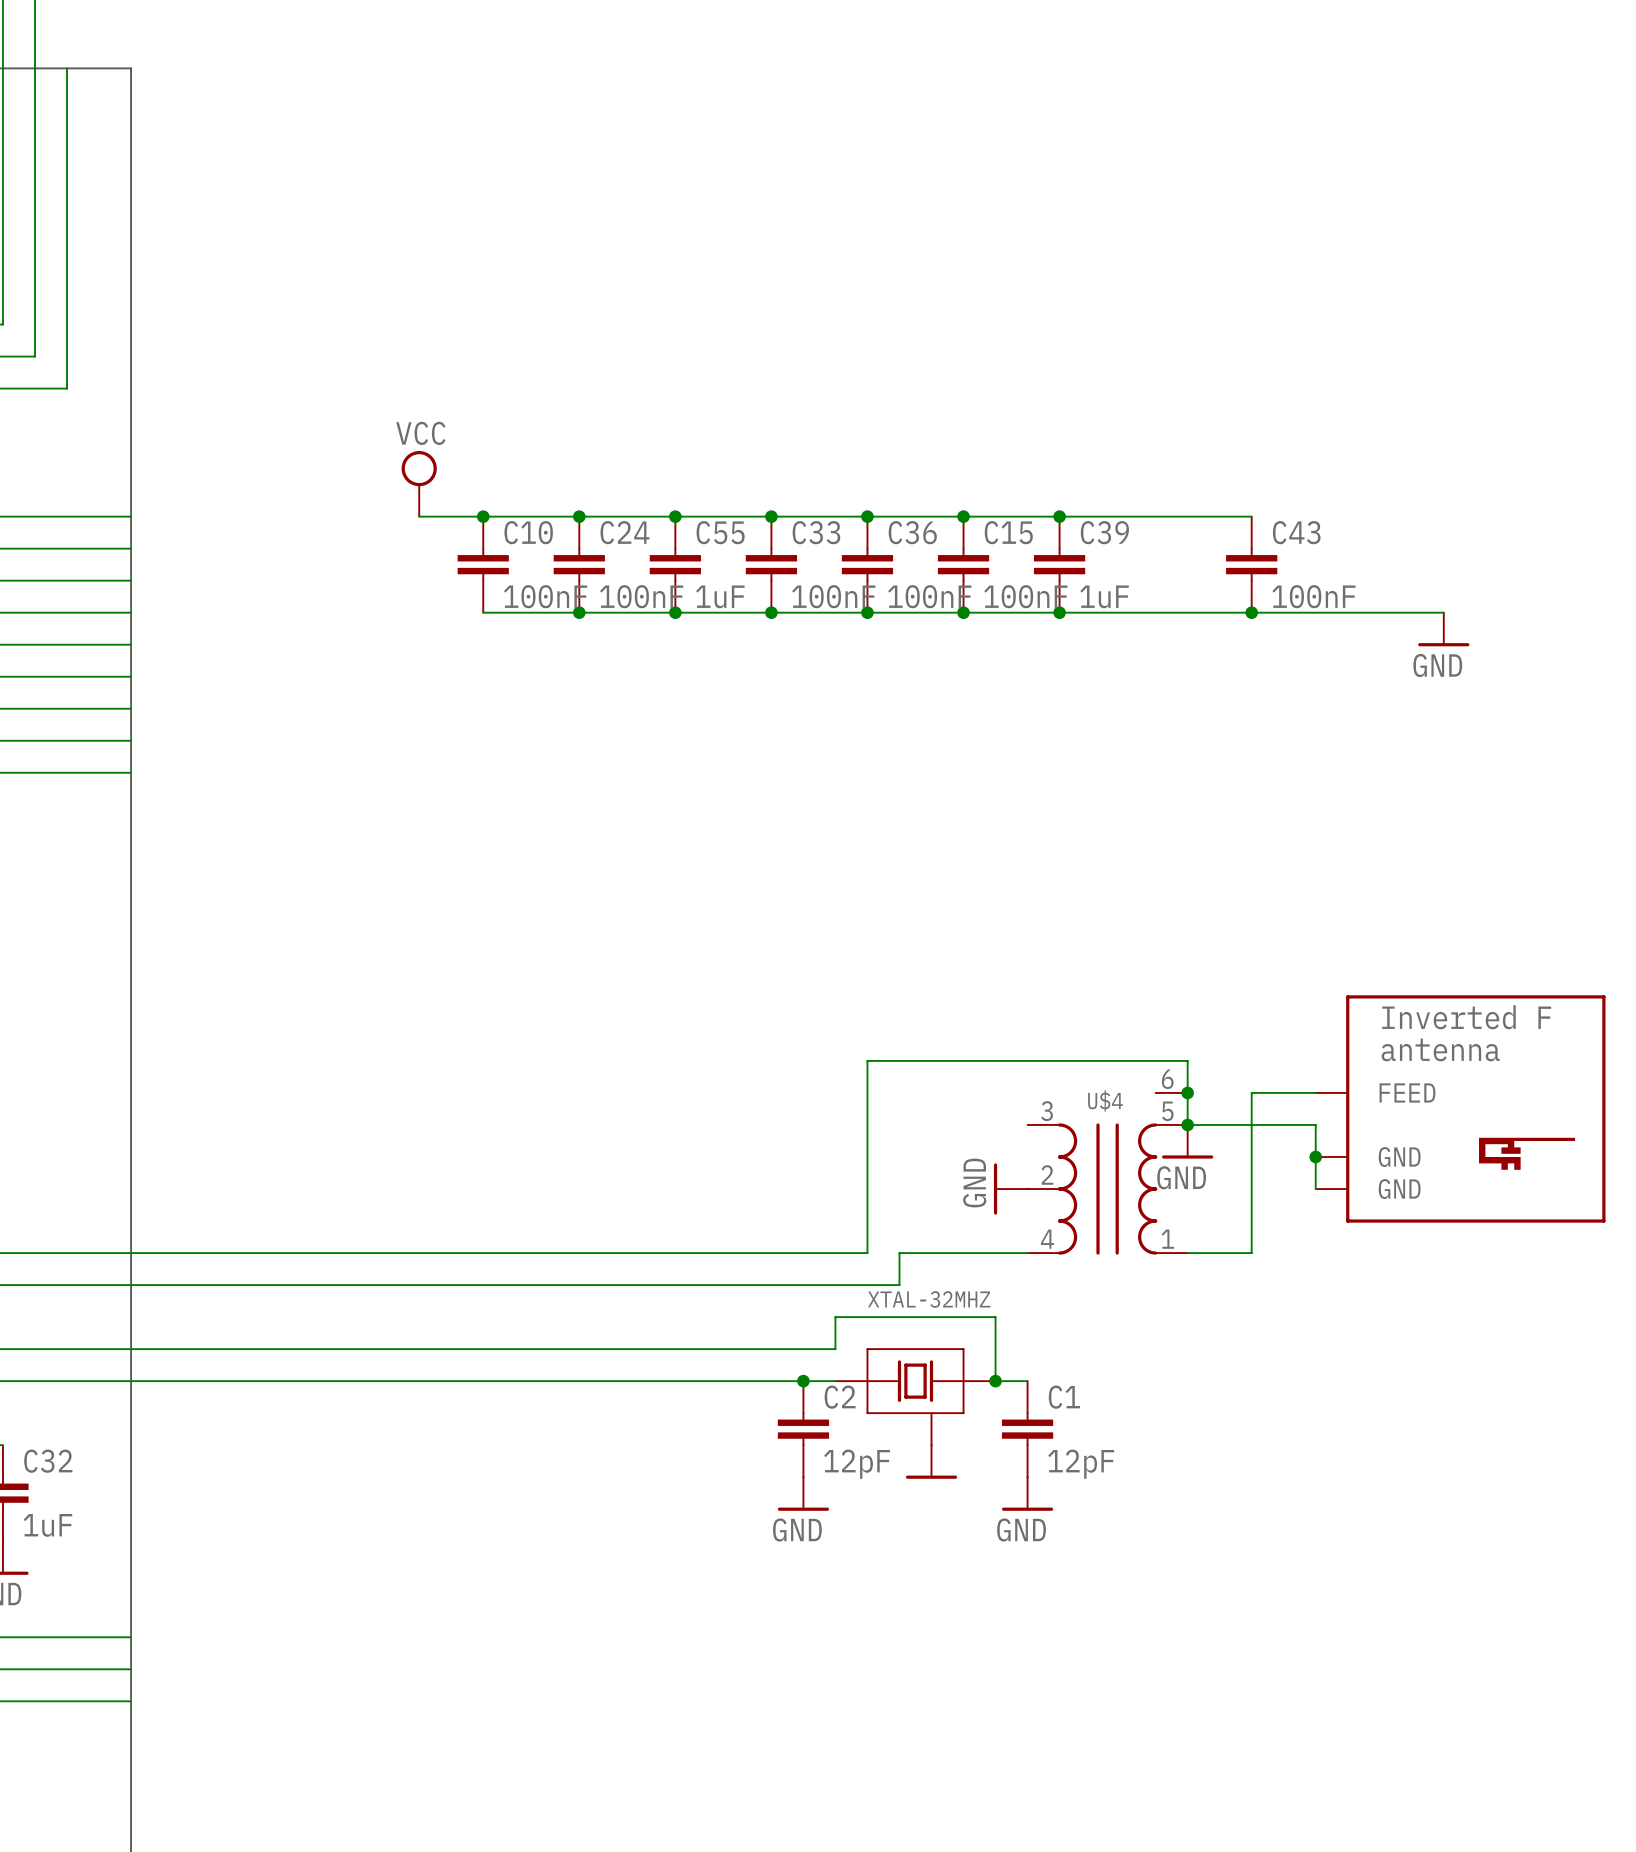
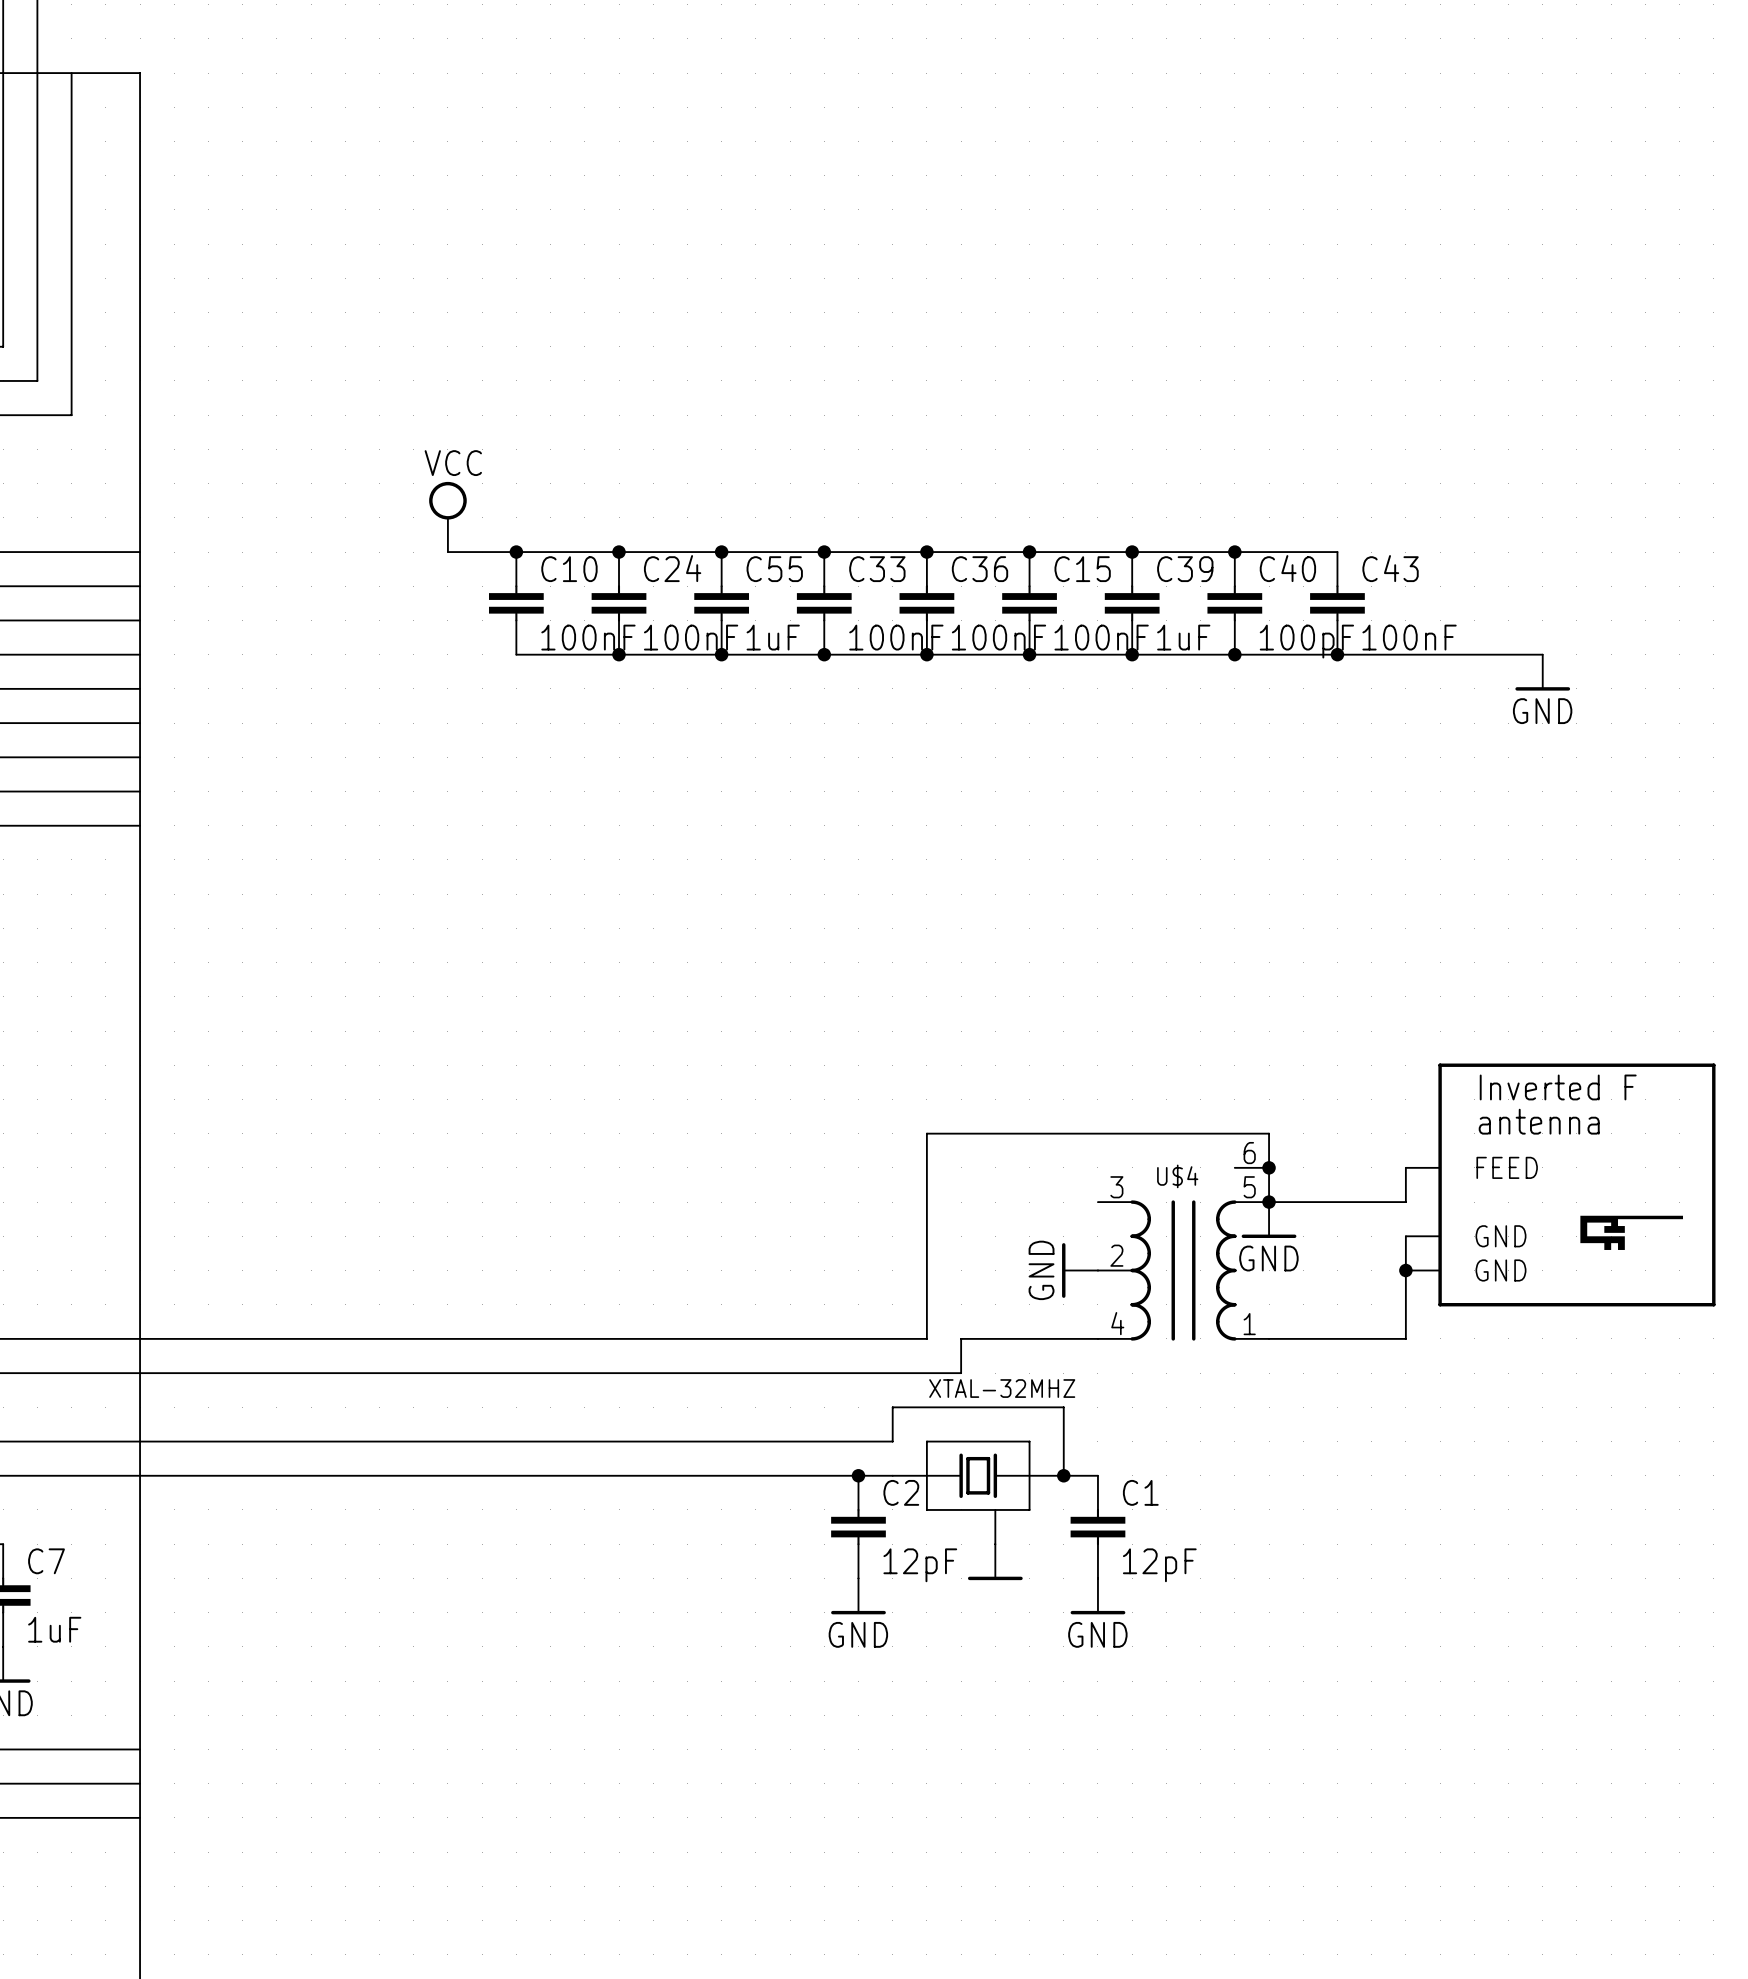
junction: none -> (1234, 552)
C40: none -> 100pF (1234, 603)
junction: none -> (1234, 654)
wire: (1315, 1092) (1251, 1092) (1251, 1253) -> (1405, 1270) (1405, 1338) (1337, 1338)
wire: (1315, 1124) (1315, 1157) -> (1405, 1202) (1405, 1167)
junction position: (1315, 1157) -> (1405, 1270)
C32 name: C32 (48, 1461) -> C7 (46, 1561)

